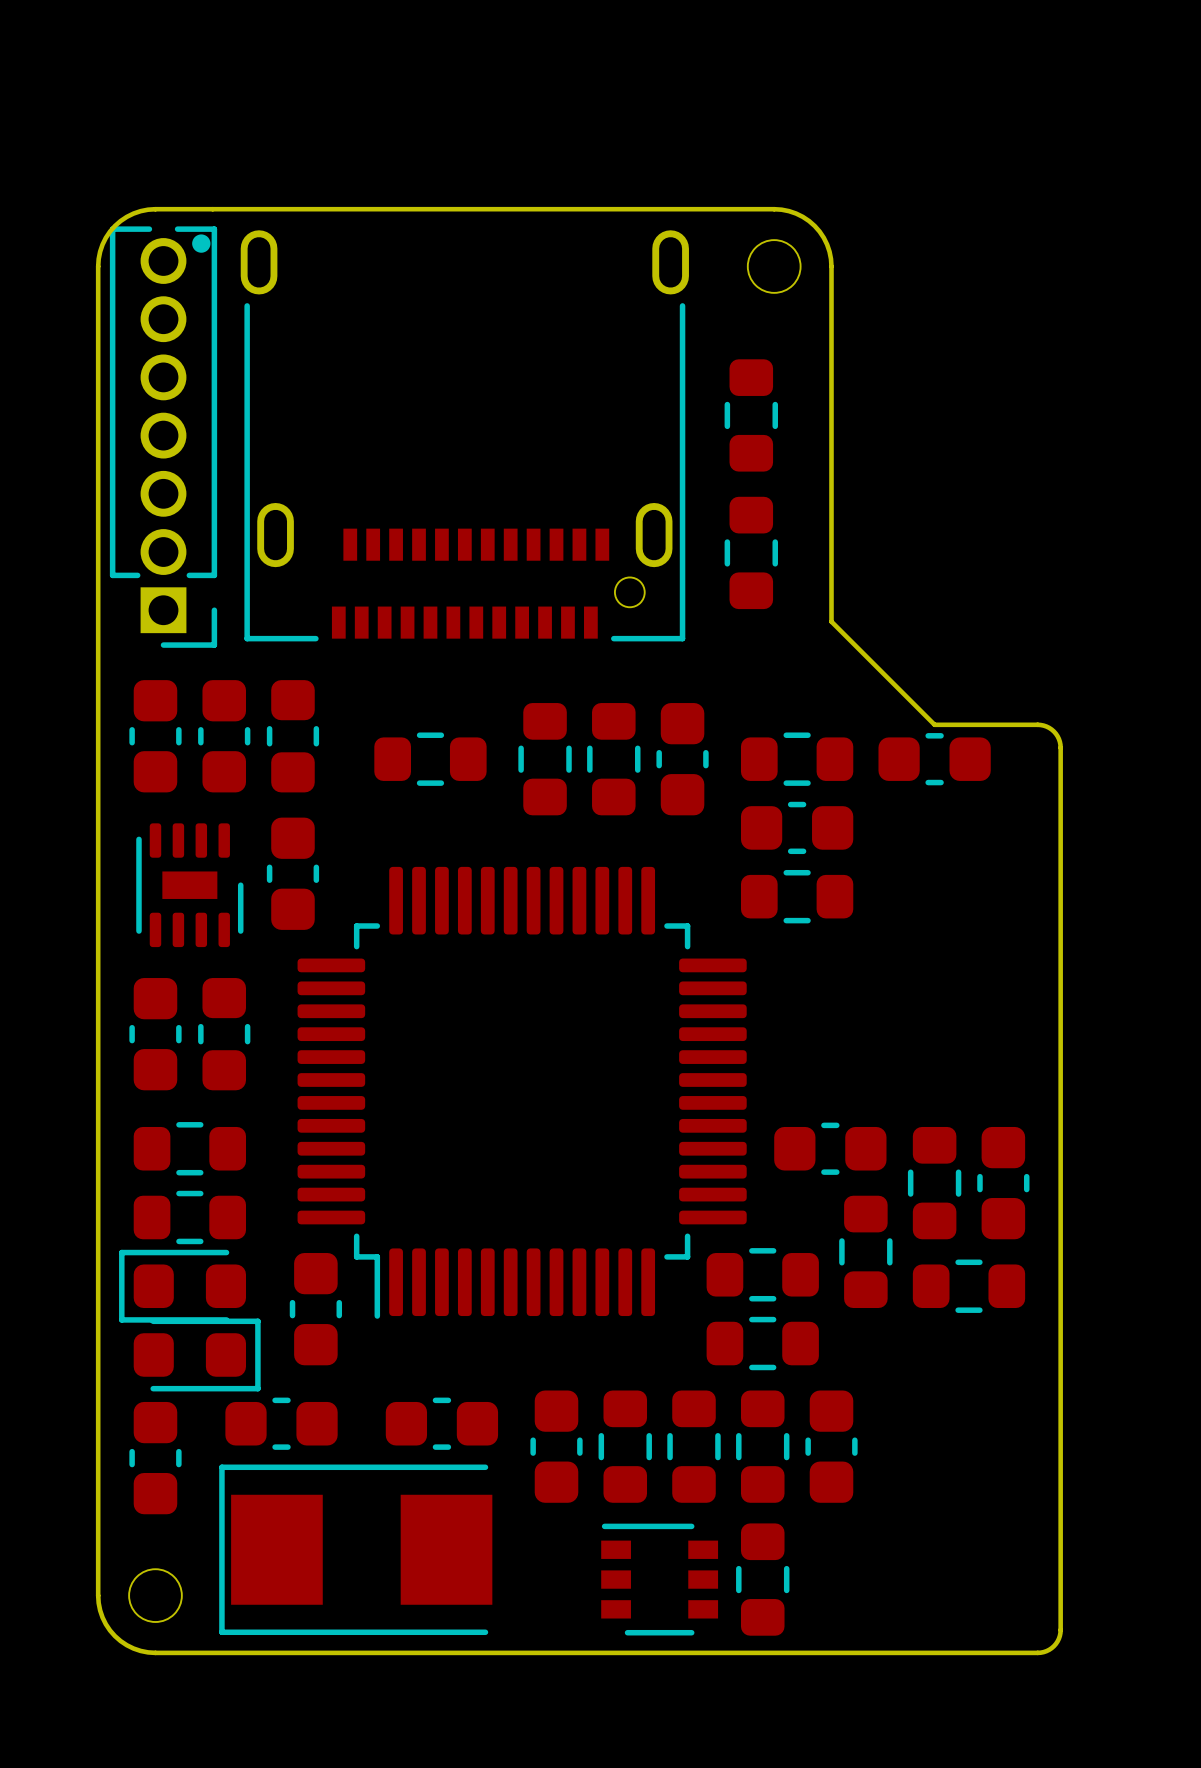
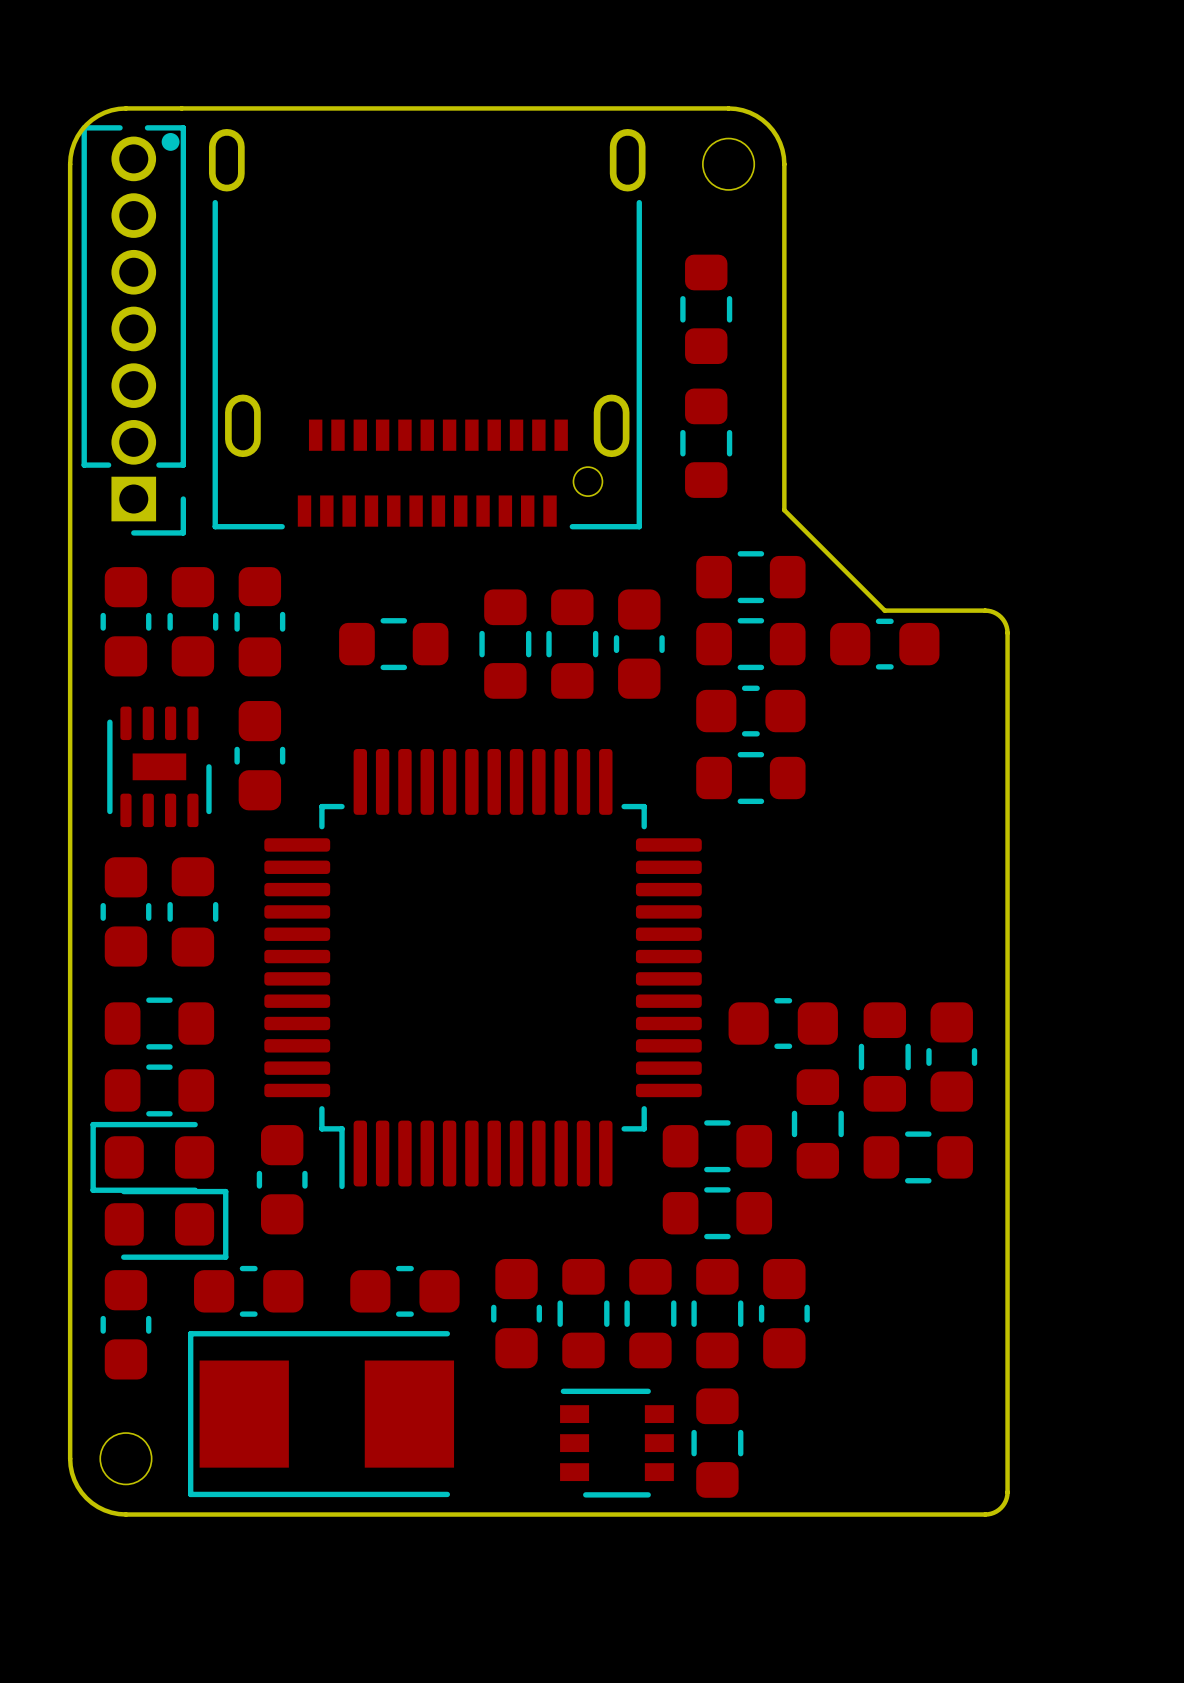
part: none -> (750, 577)

